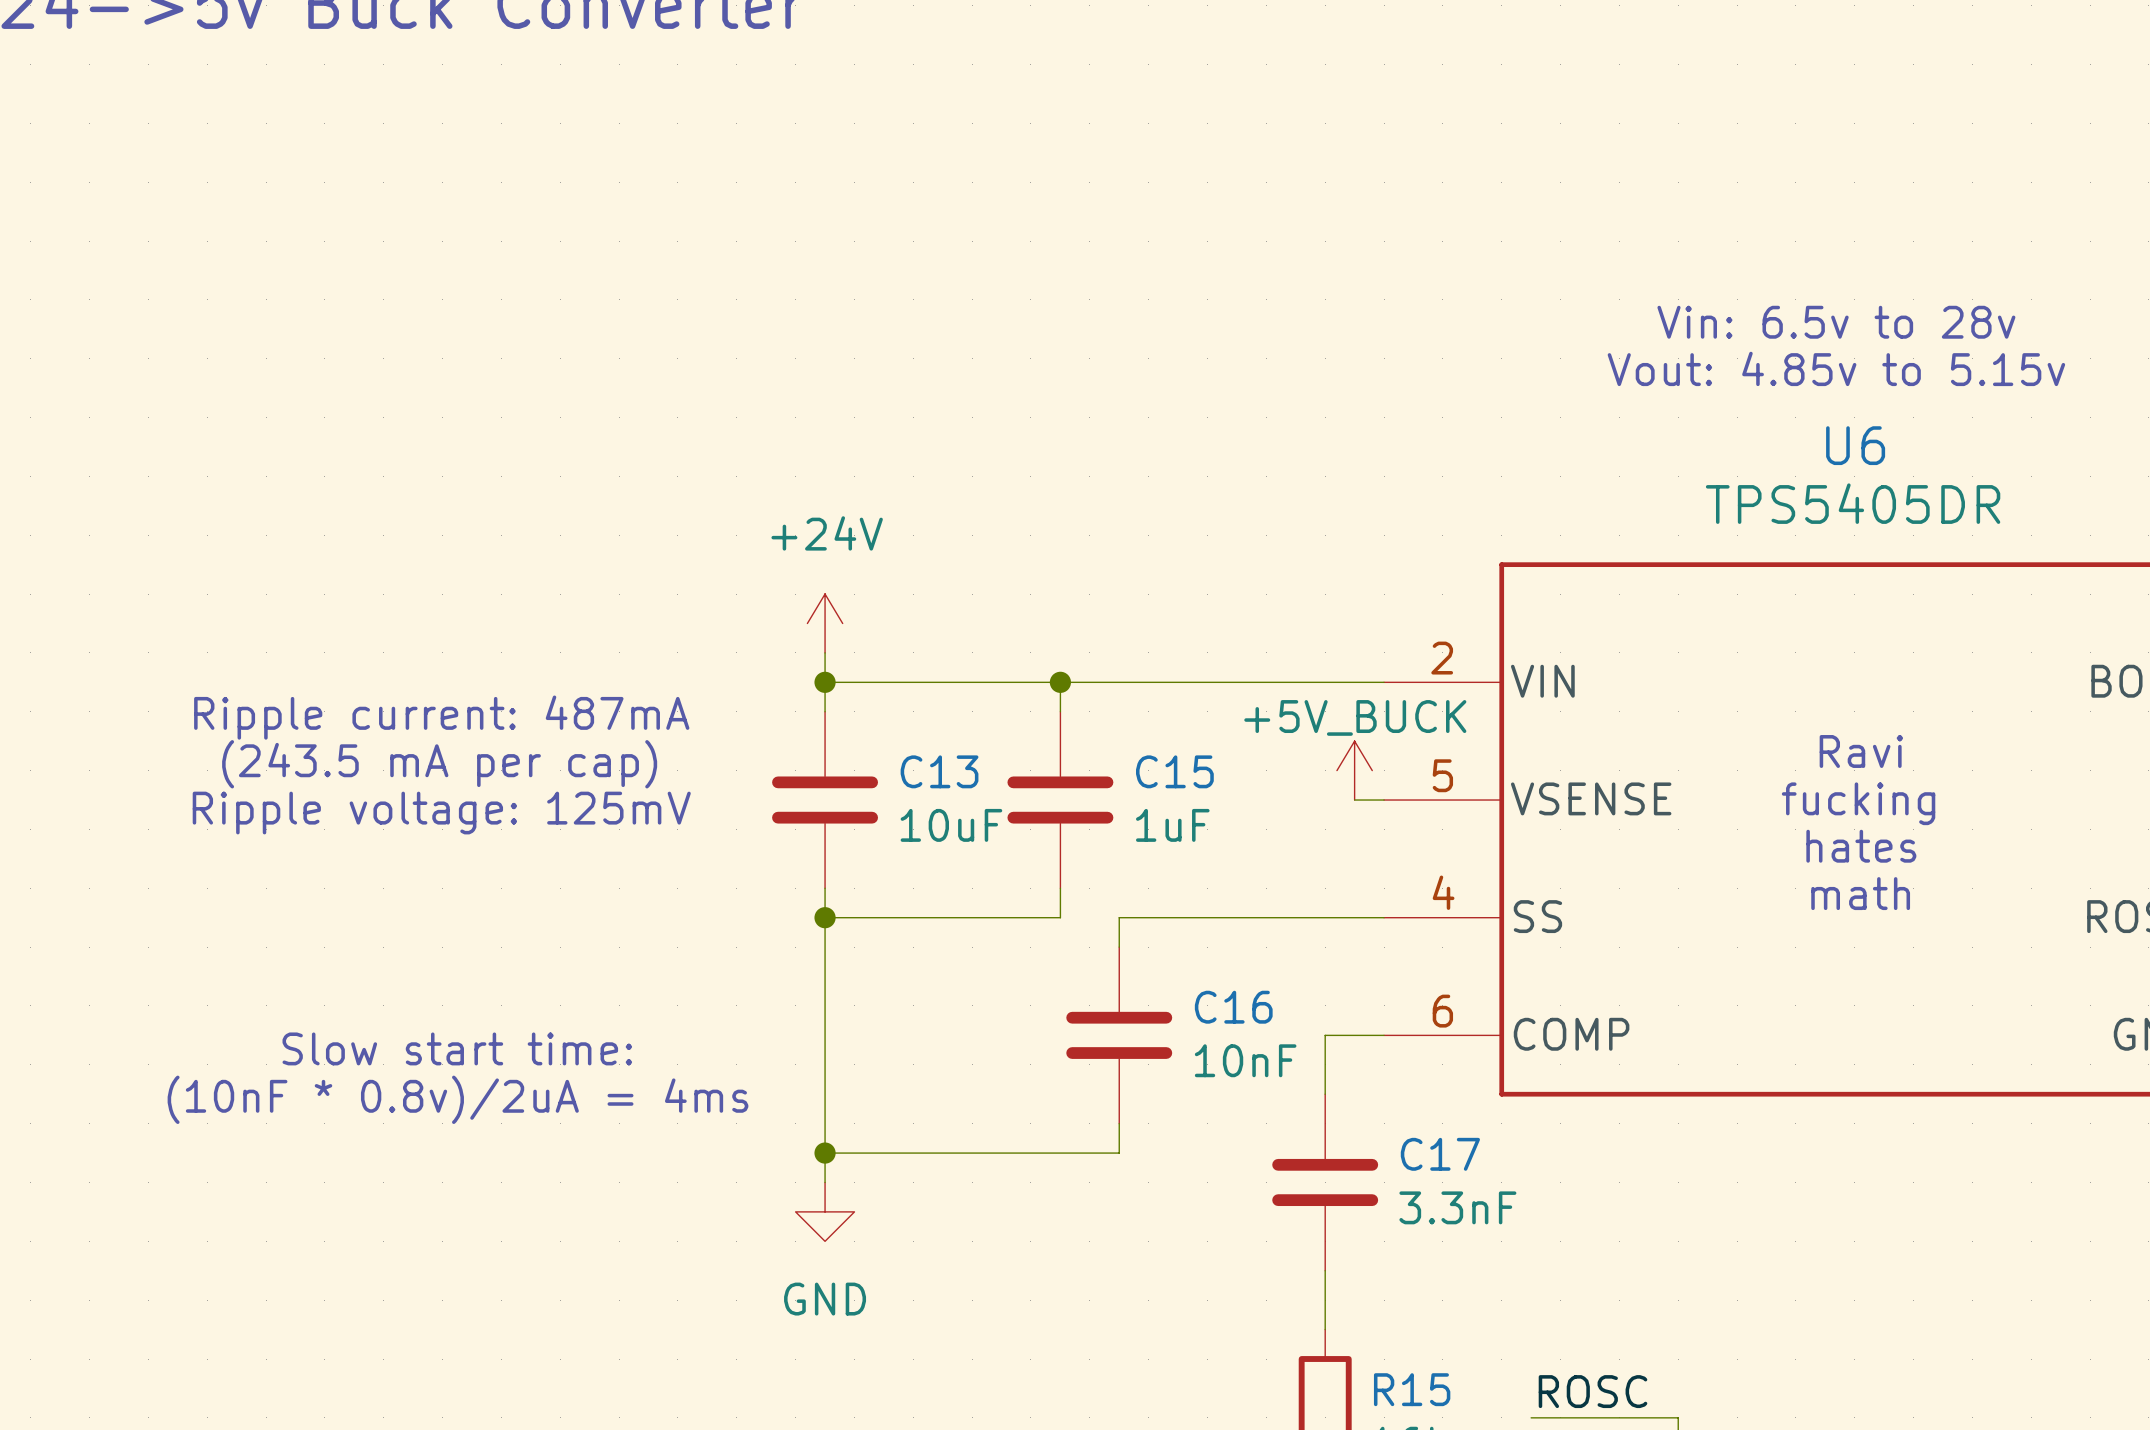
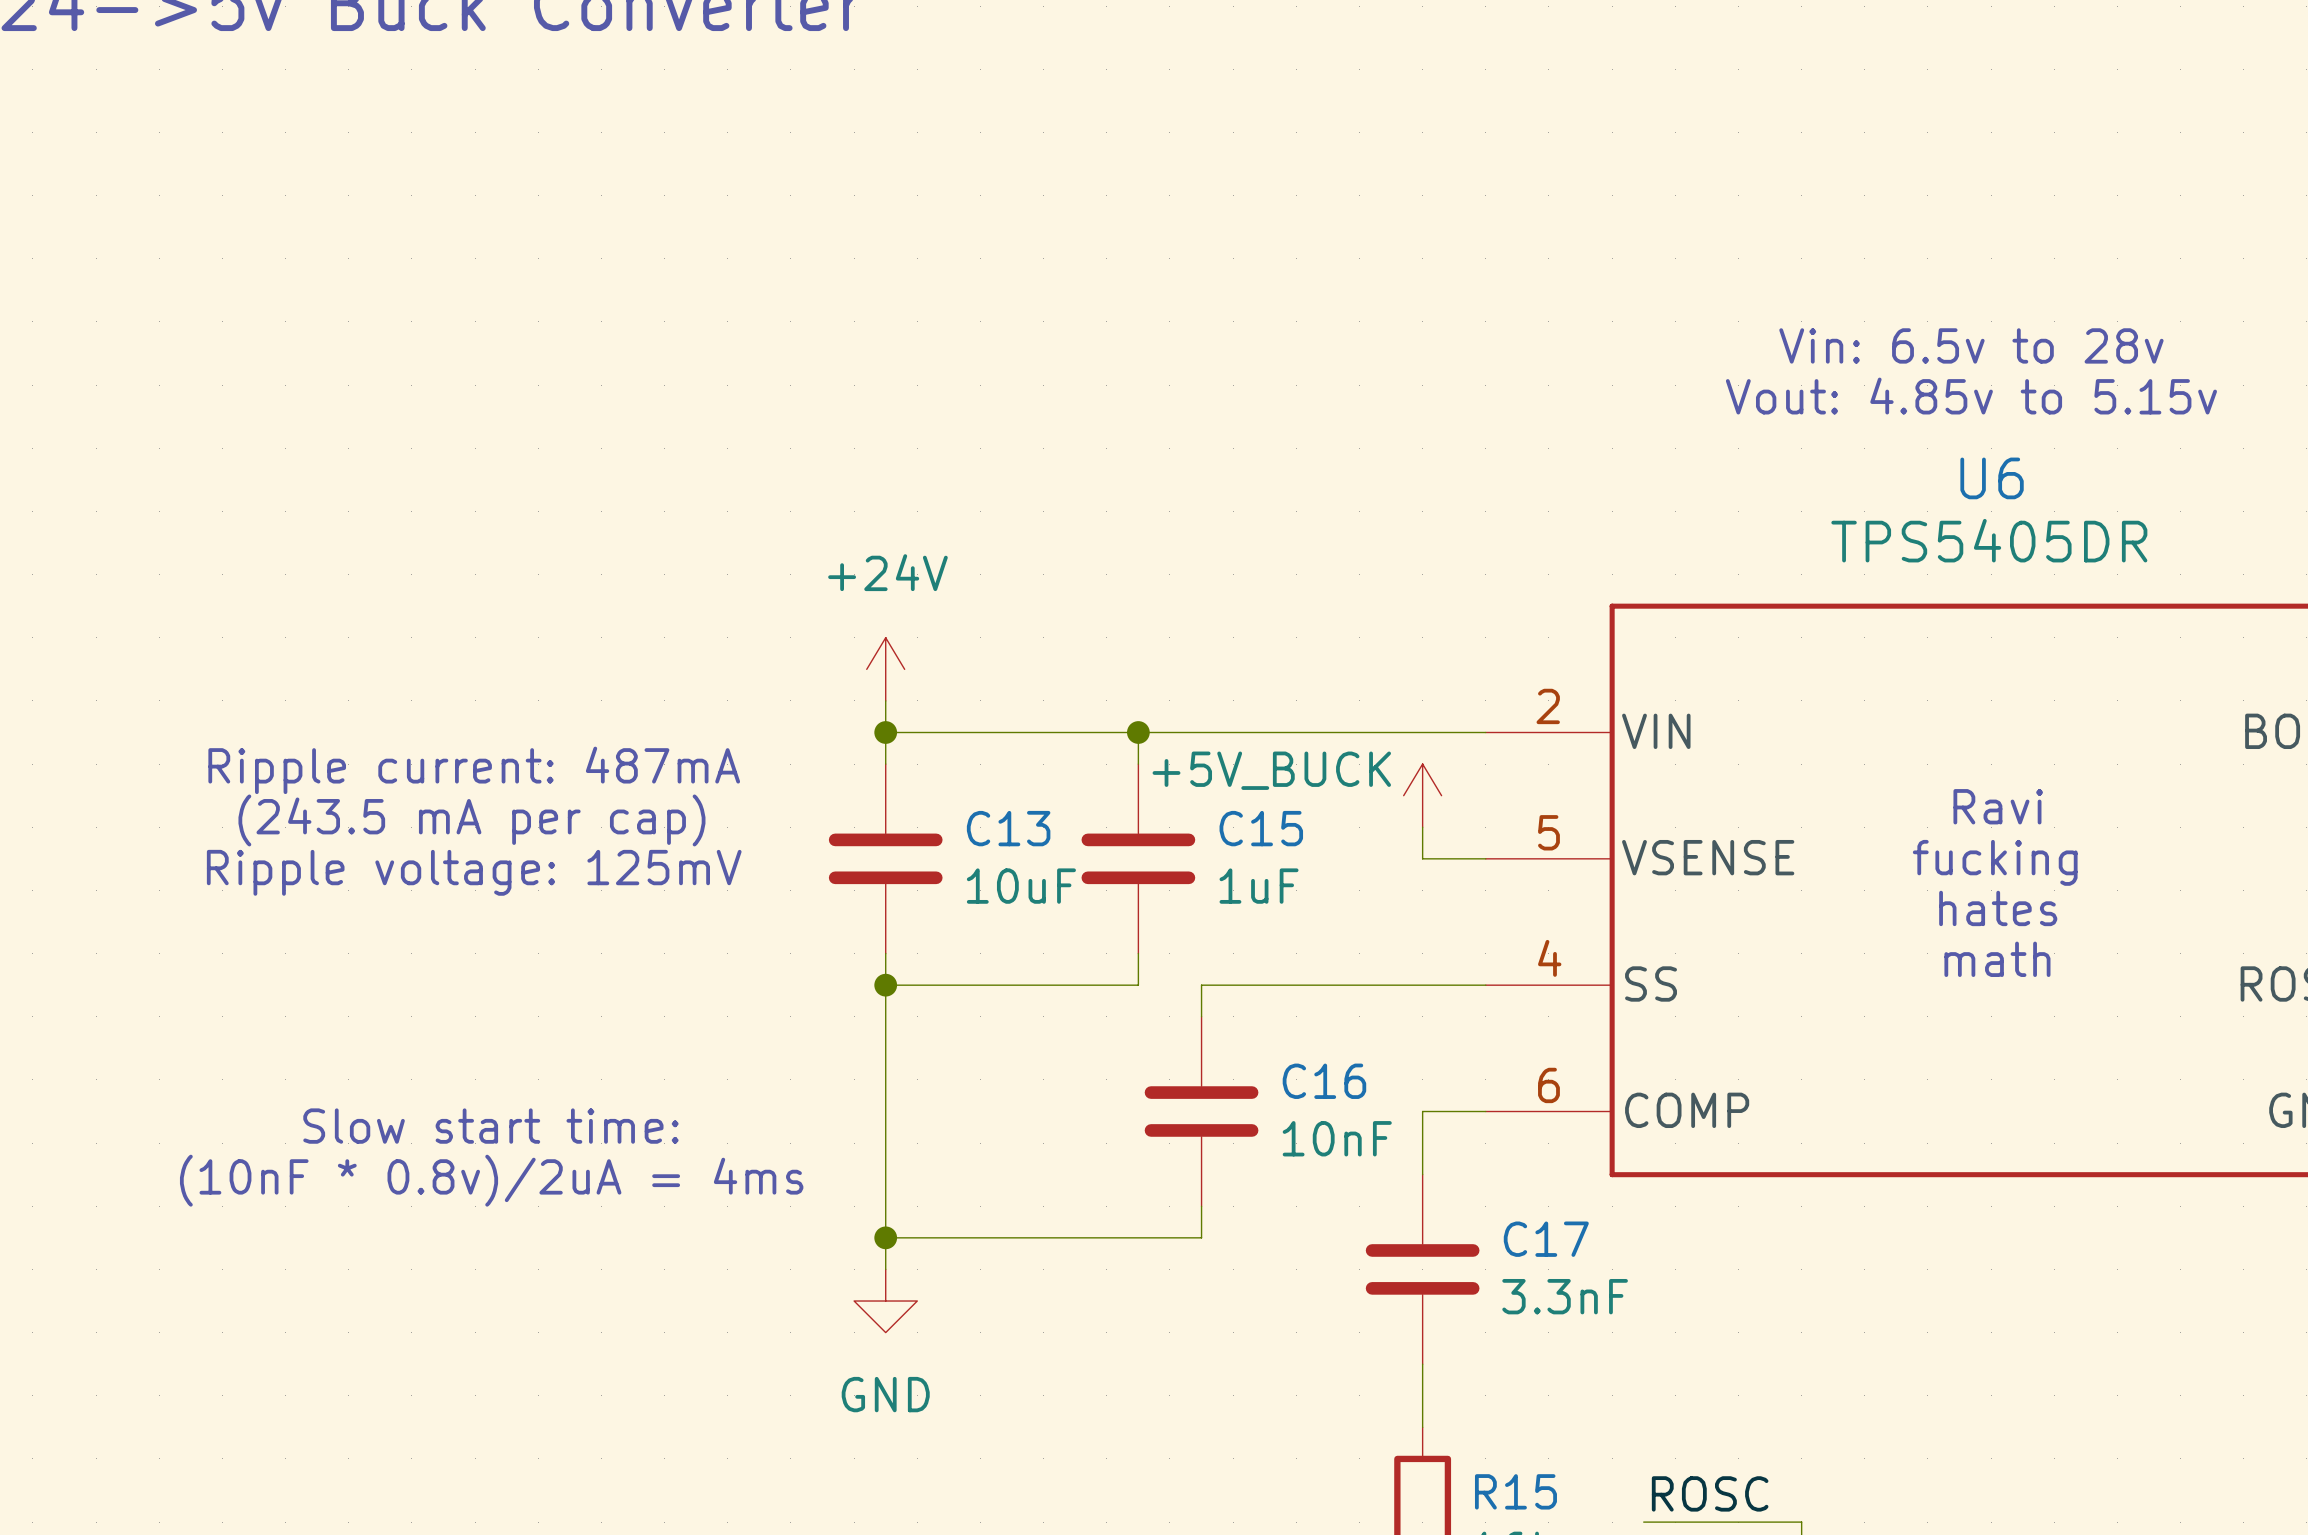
power symbol text position: +5V_BUCK (1355, 717) -> +5V_BUCK (1271, 770)
wire: none -> (1422, 827) (1422, 858) (1454, 858)
power symbol position: +5V_BUCK (1354, 770) -> +5V_BUCK (1422, 795)

